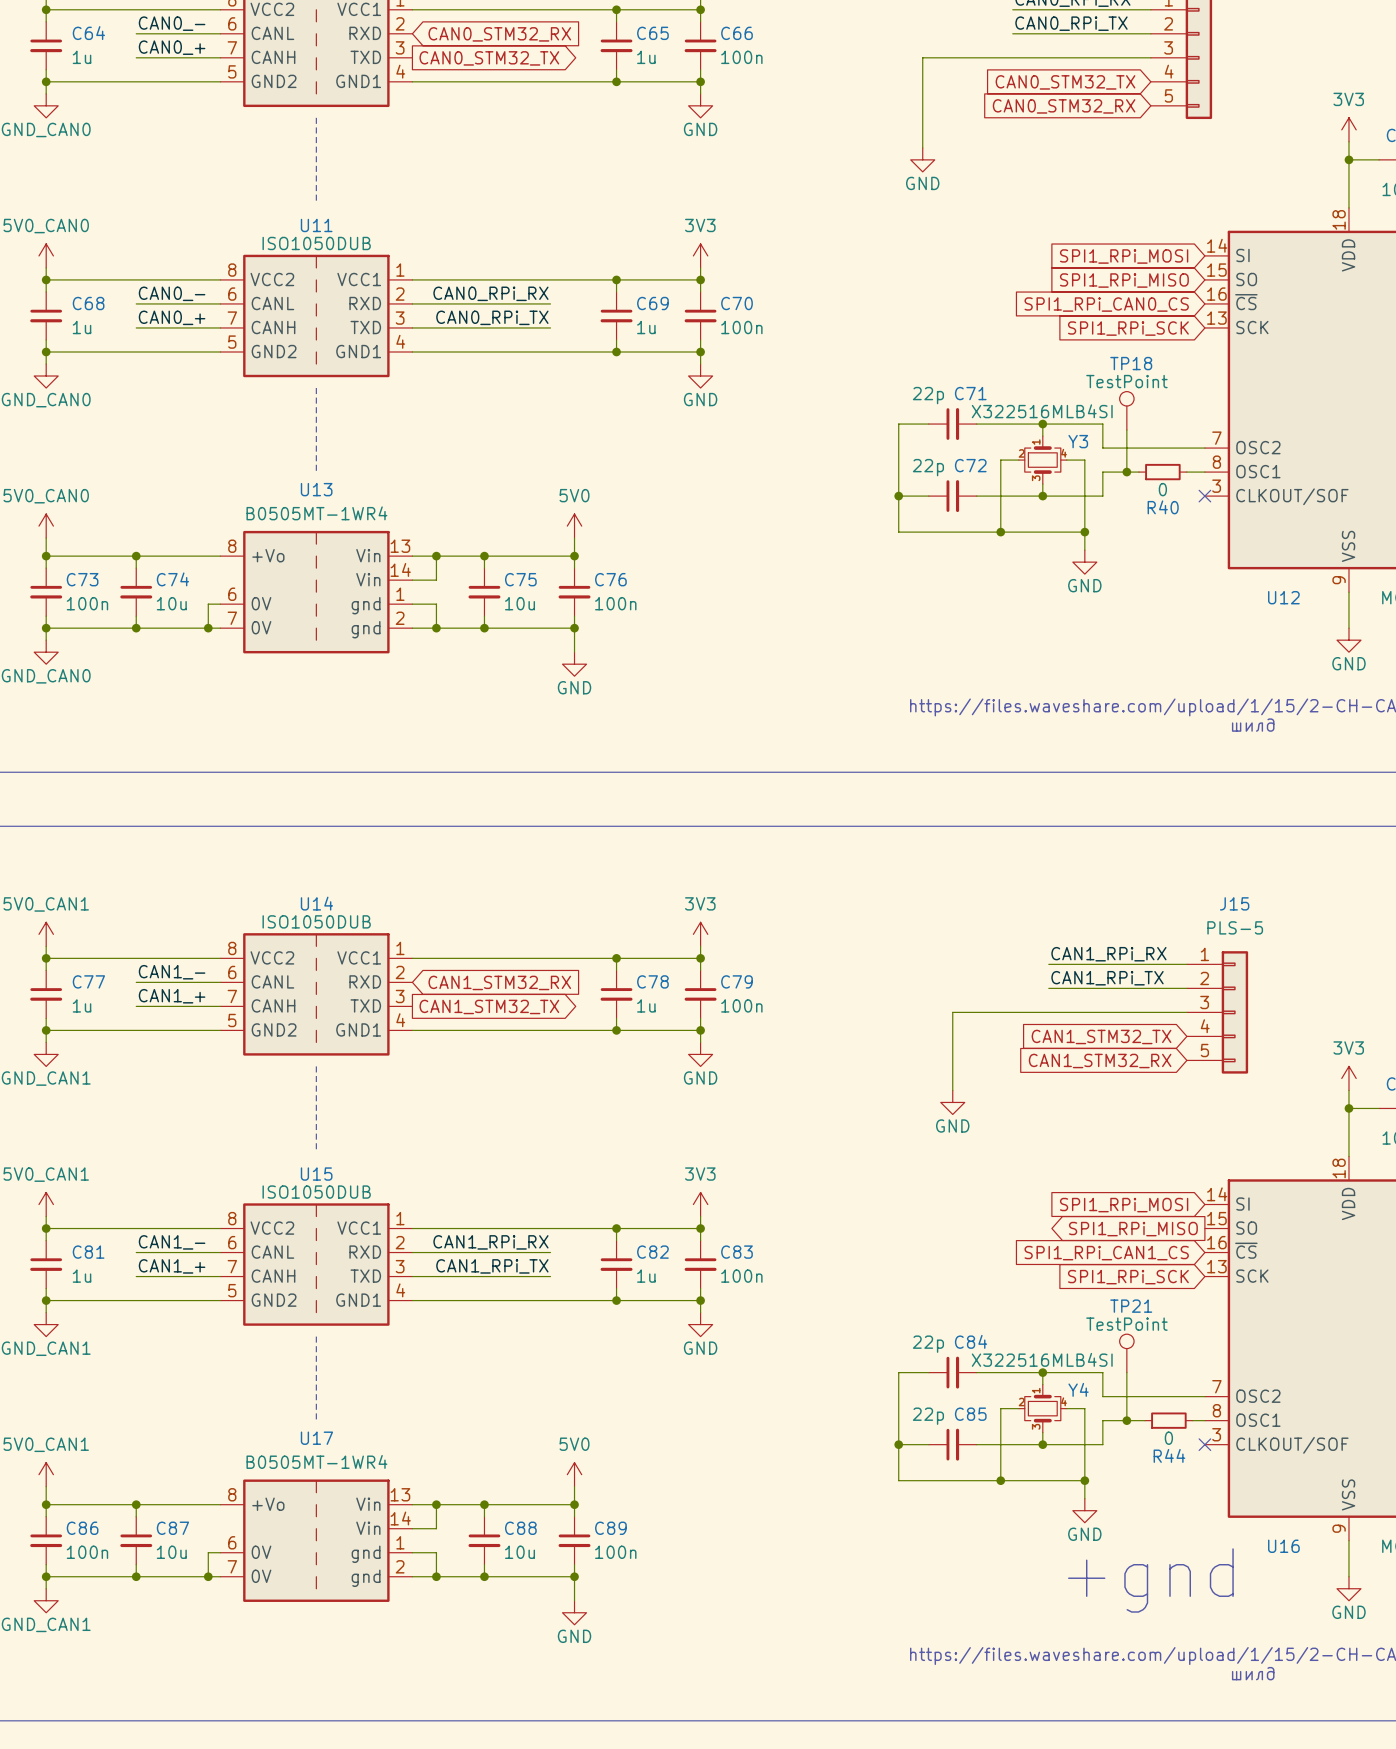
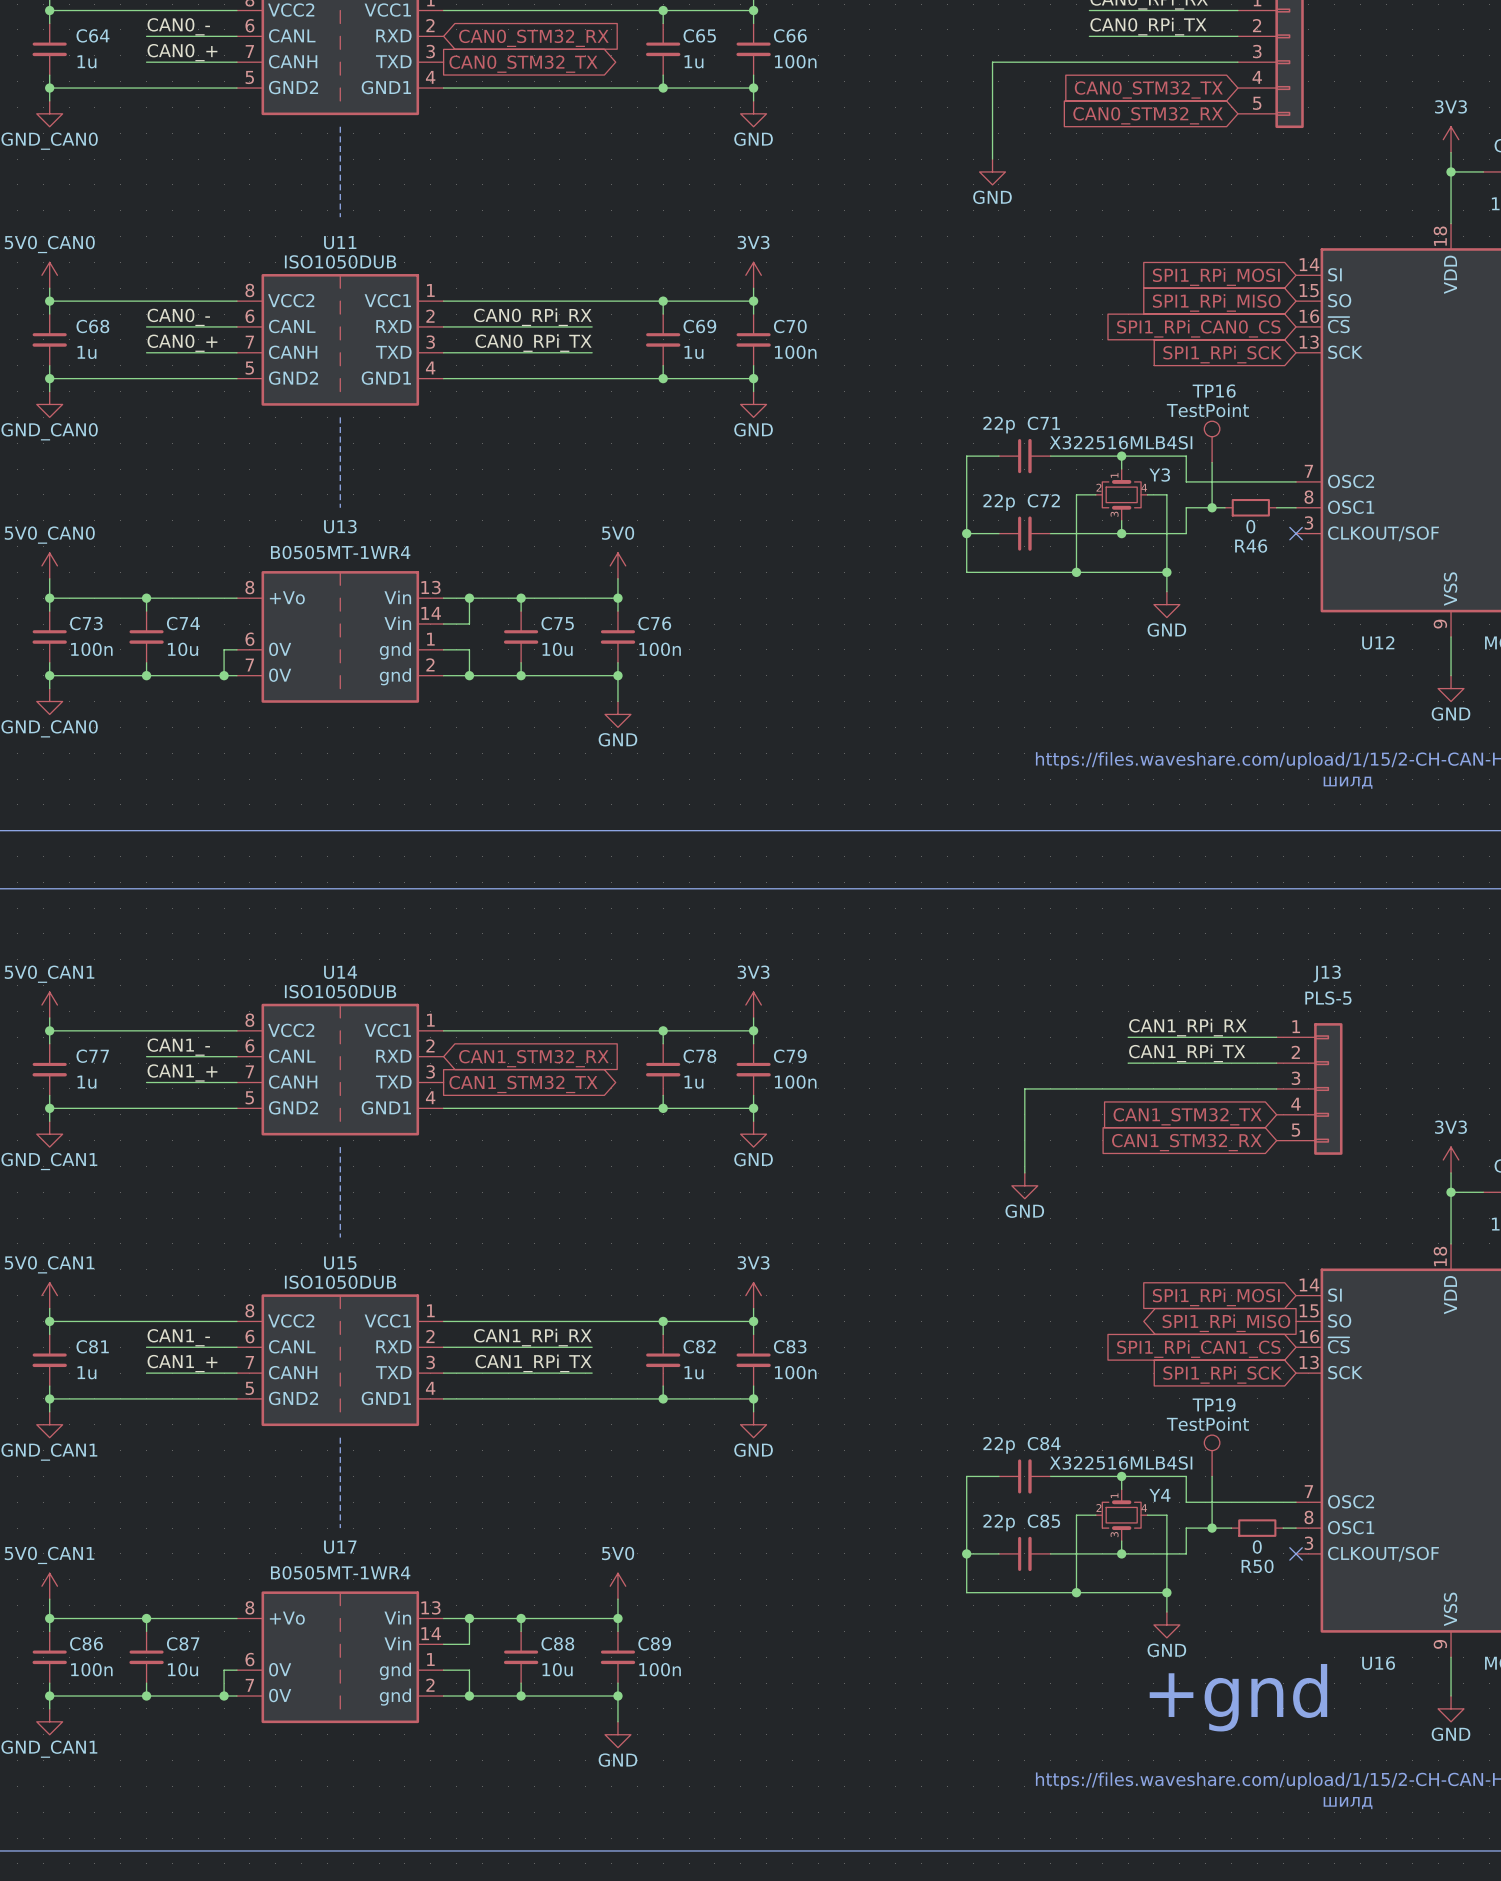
TP18 name: TP18 (1131, 363) -> TP16 (1214, 391)
R40 name: R40 (1163, 507) -> R46 (1251, 546)
J15 name: J15 (1234, 903) -> J13 (1327, 973)
TP21 name: TP21 (1131, 1306) -> TP19 (1214, 1404)
R44 name: R44 (1169, 1455) -> R50 (1257, 1566)

